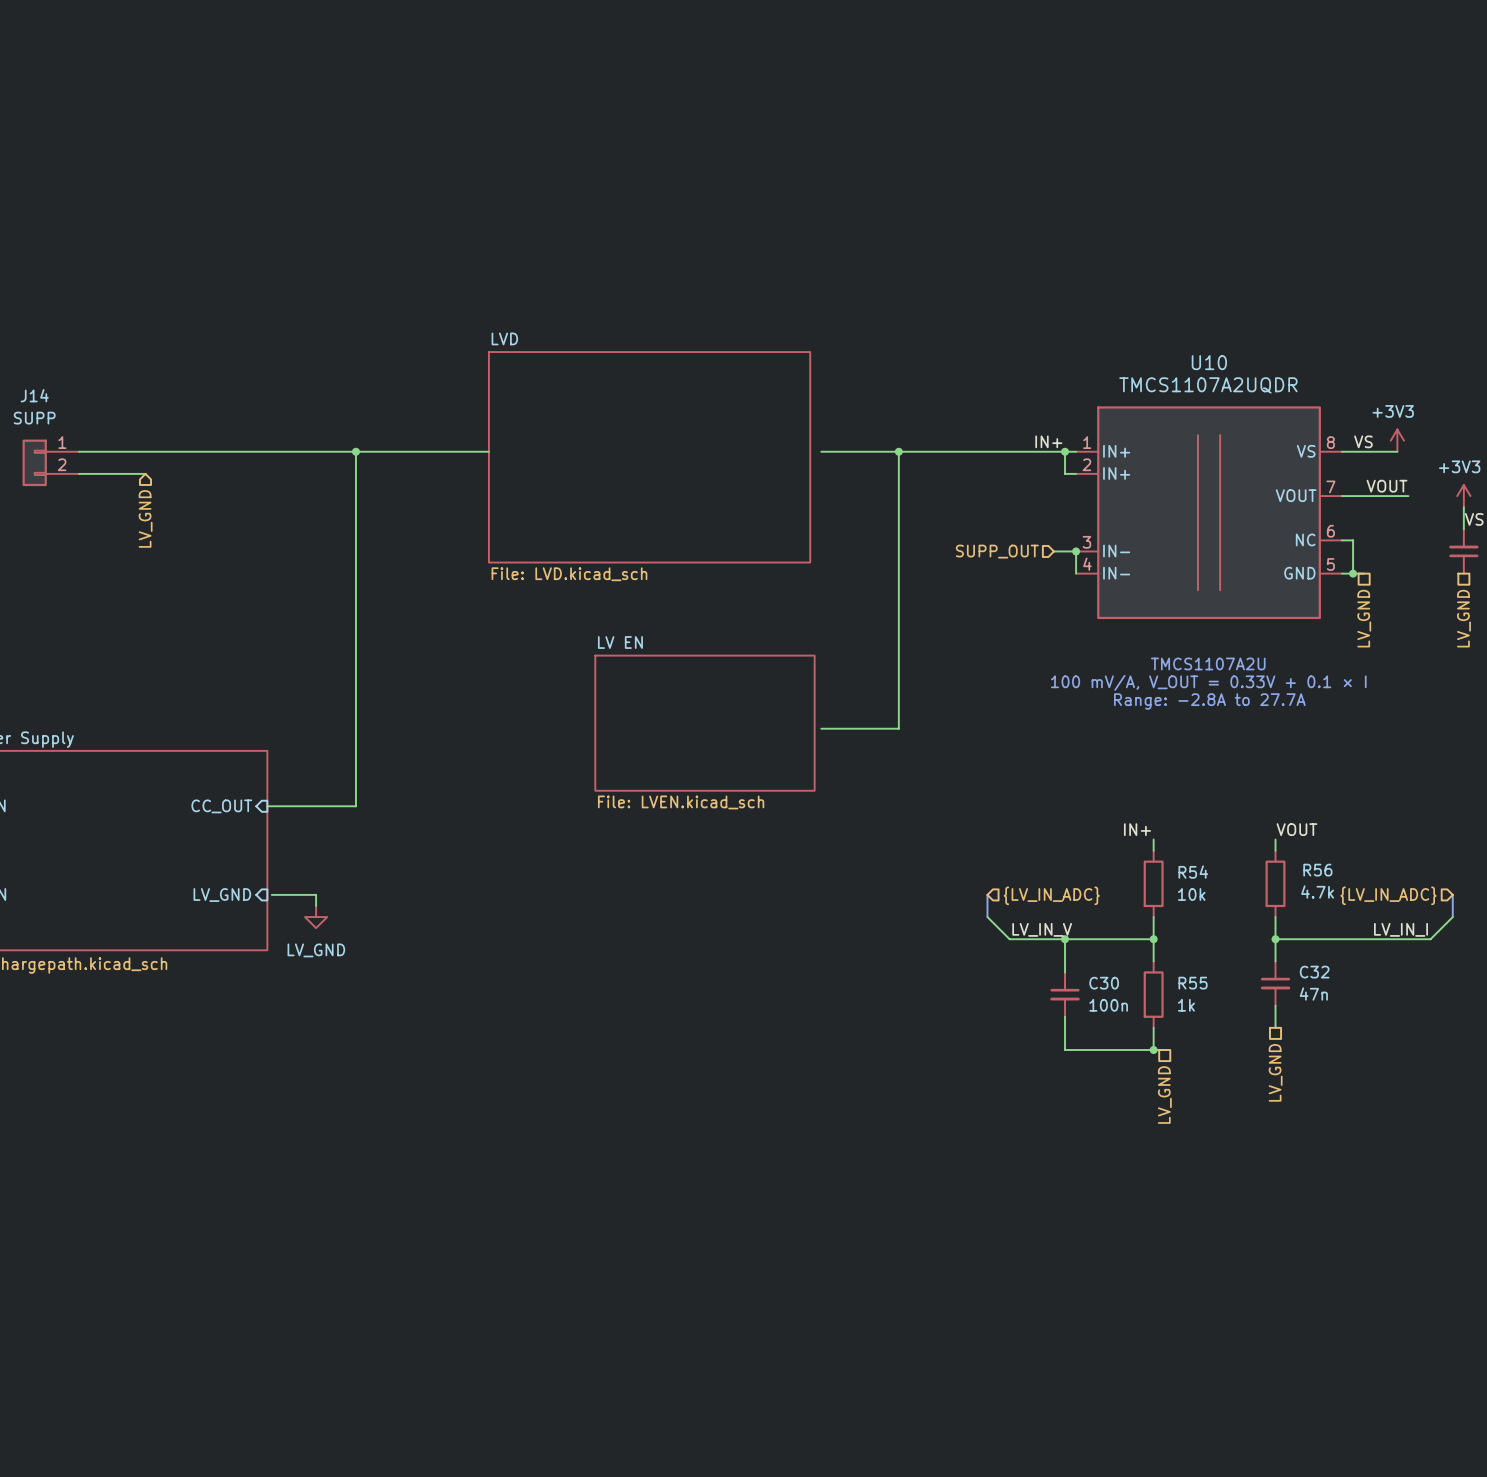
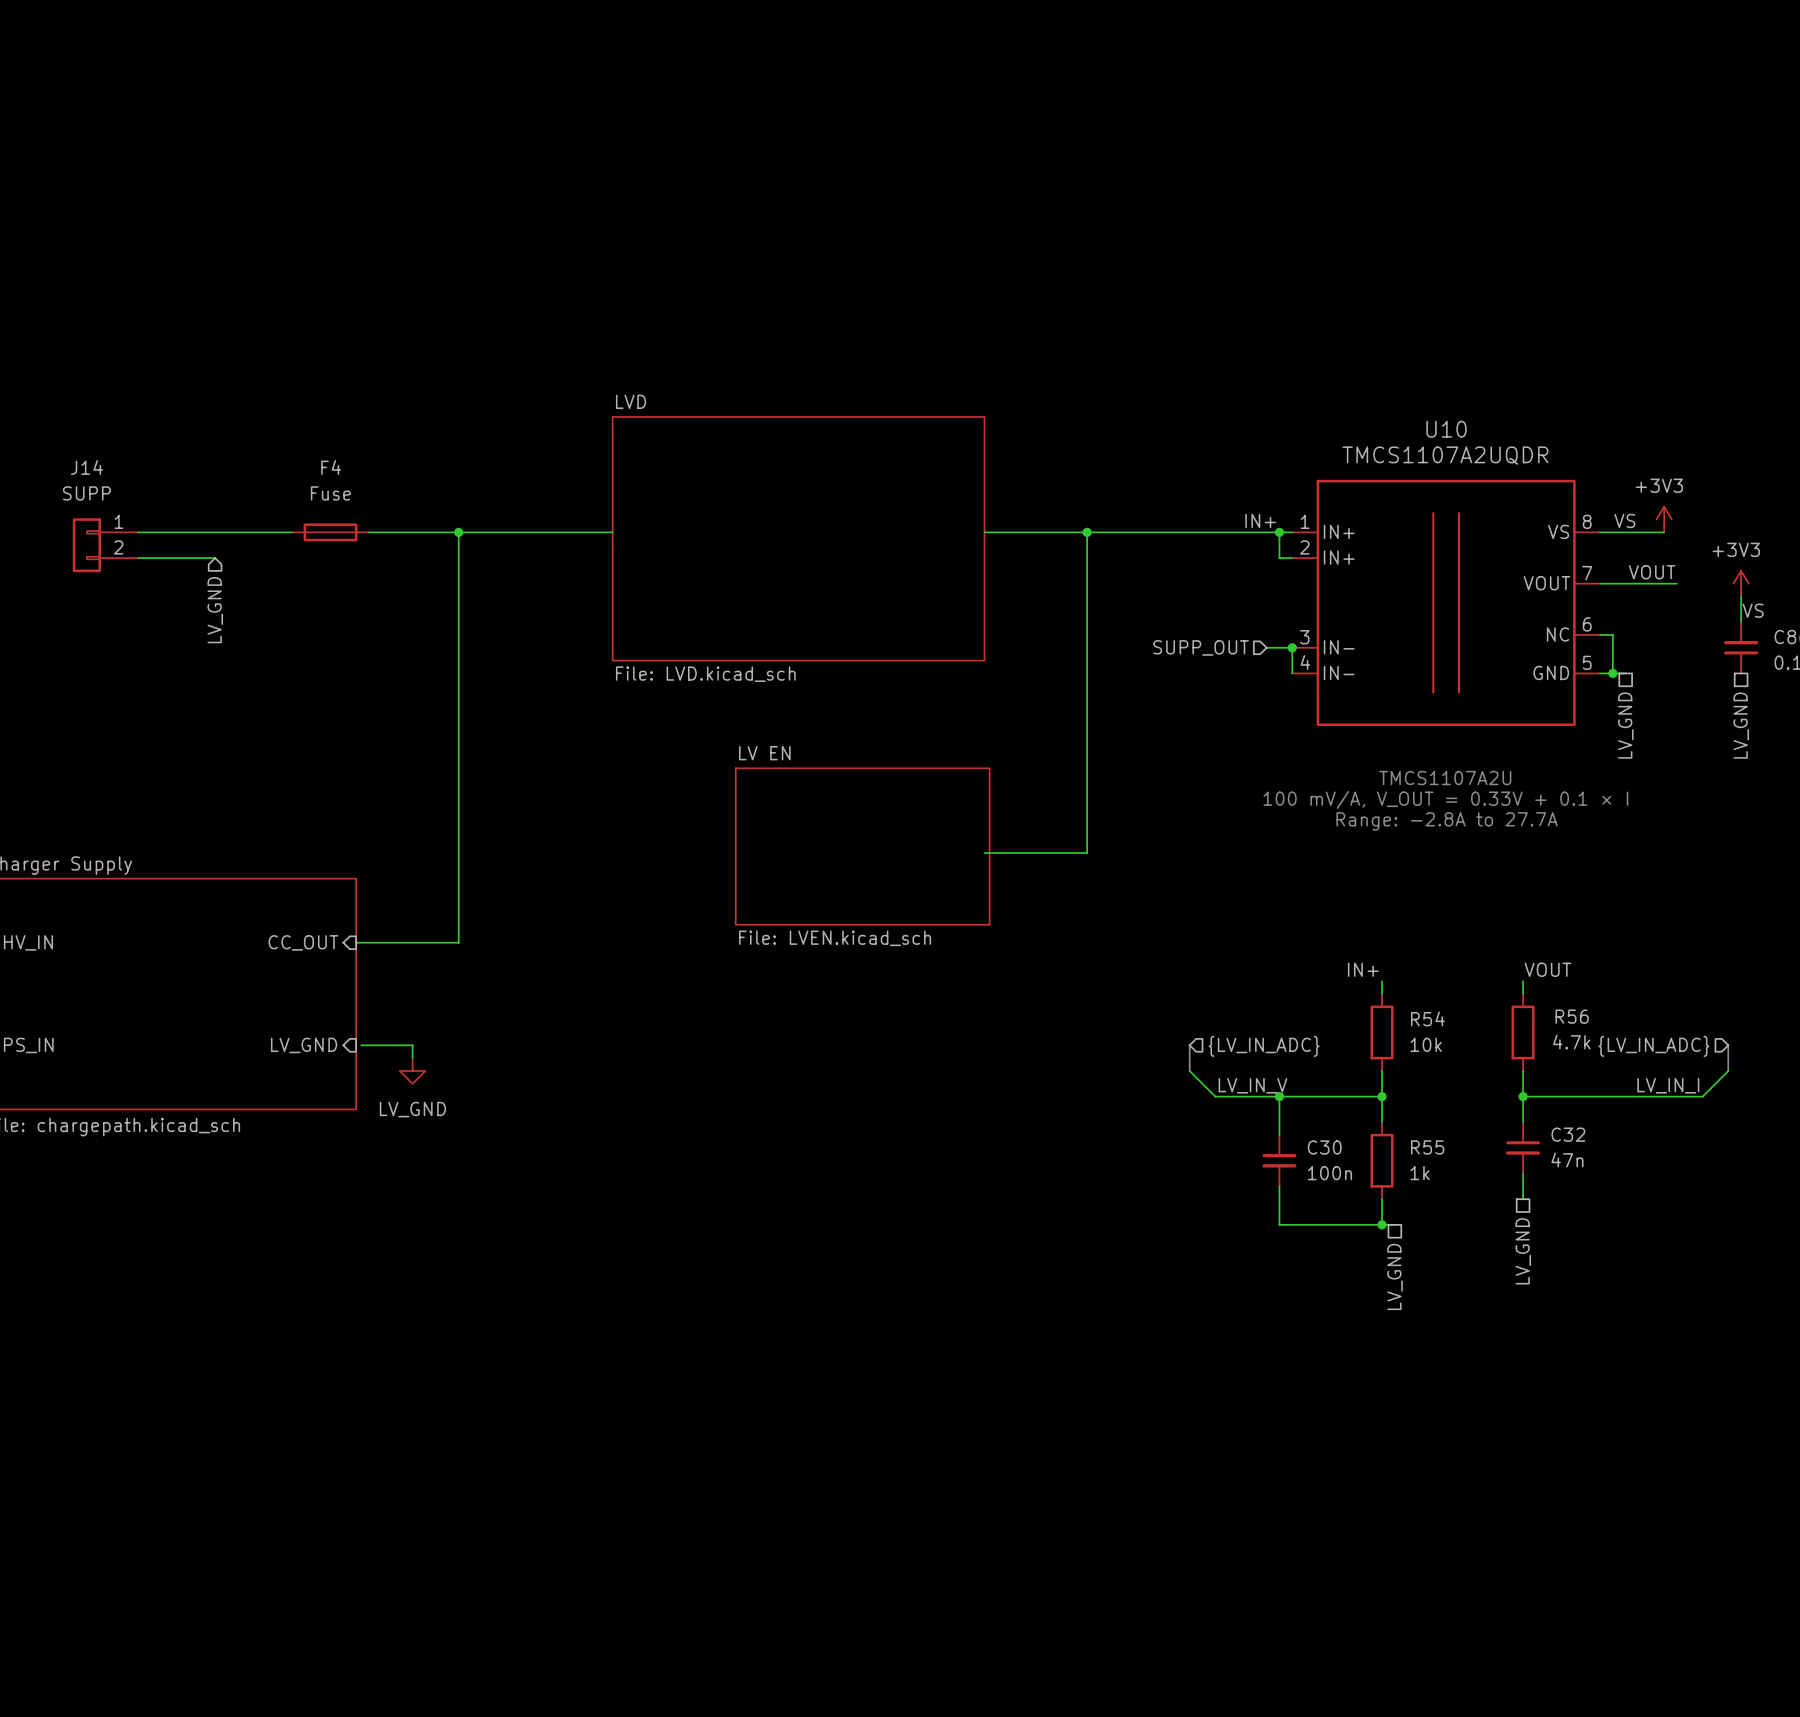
F4: none -> Fuse (330, 532)
wire: none -> (984, 532) (997, 532)
wire: none -> (984, 852) (997, 852)

